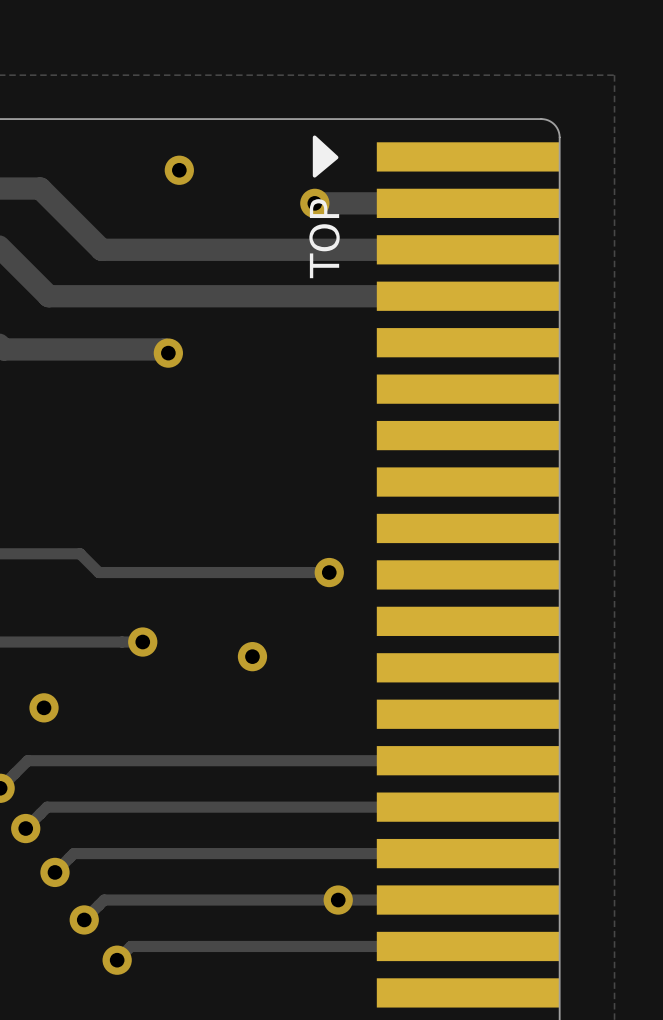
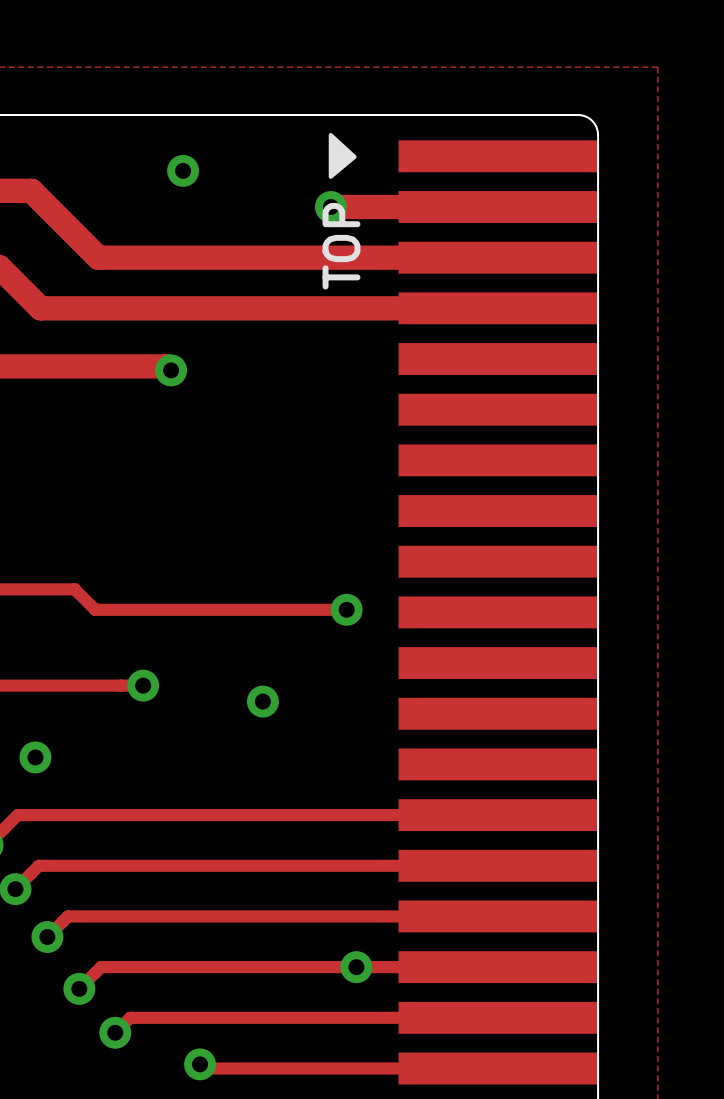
track: none -> (200, 1064) (204, 1068) (498, 1068)
via: none -> (200, 1064)

